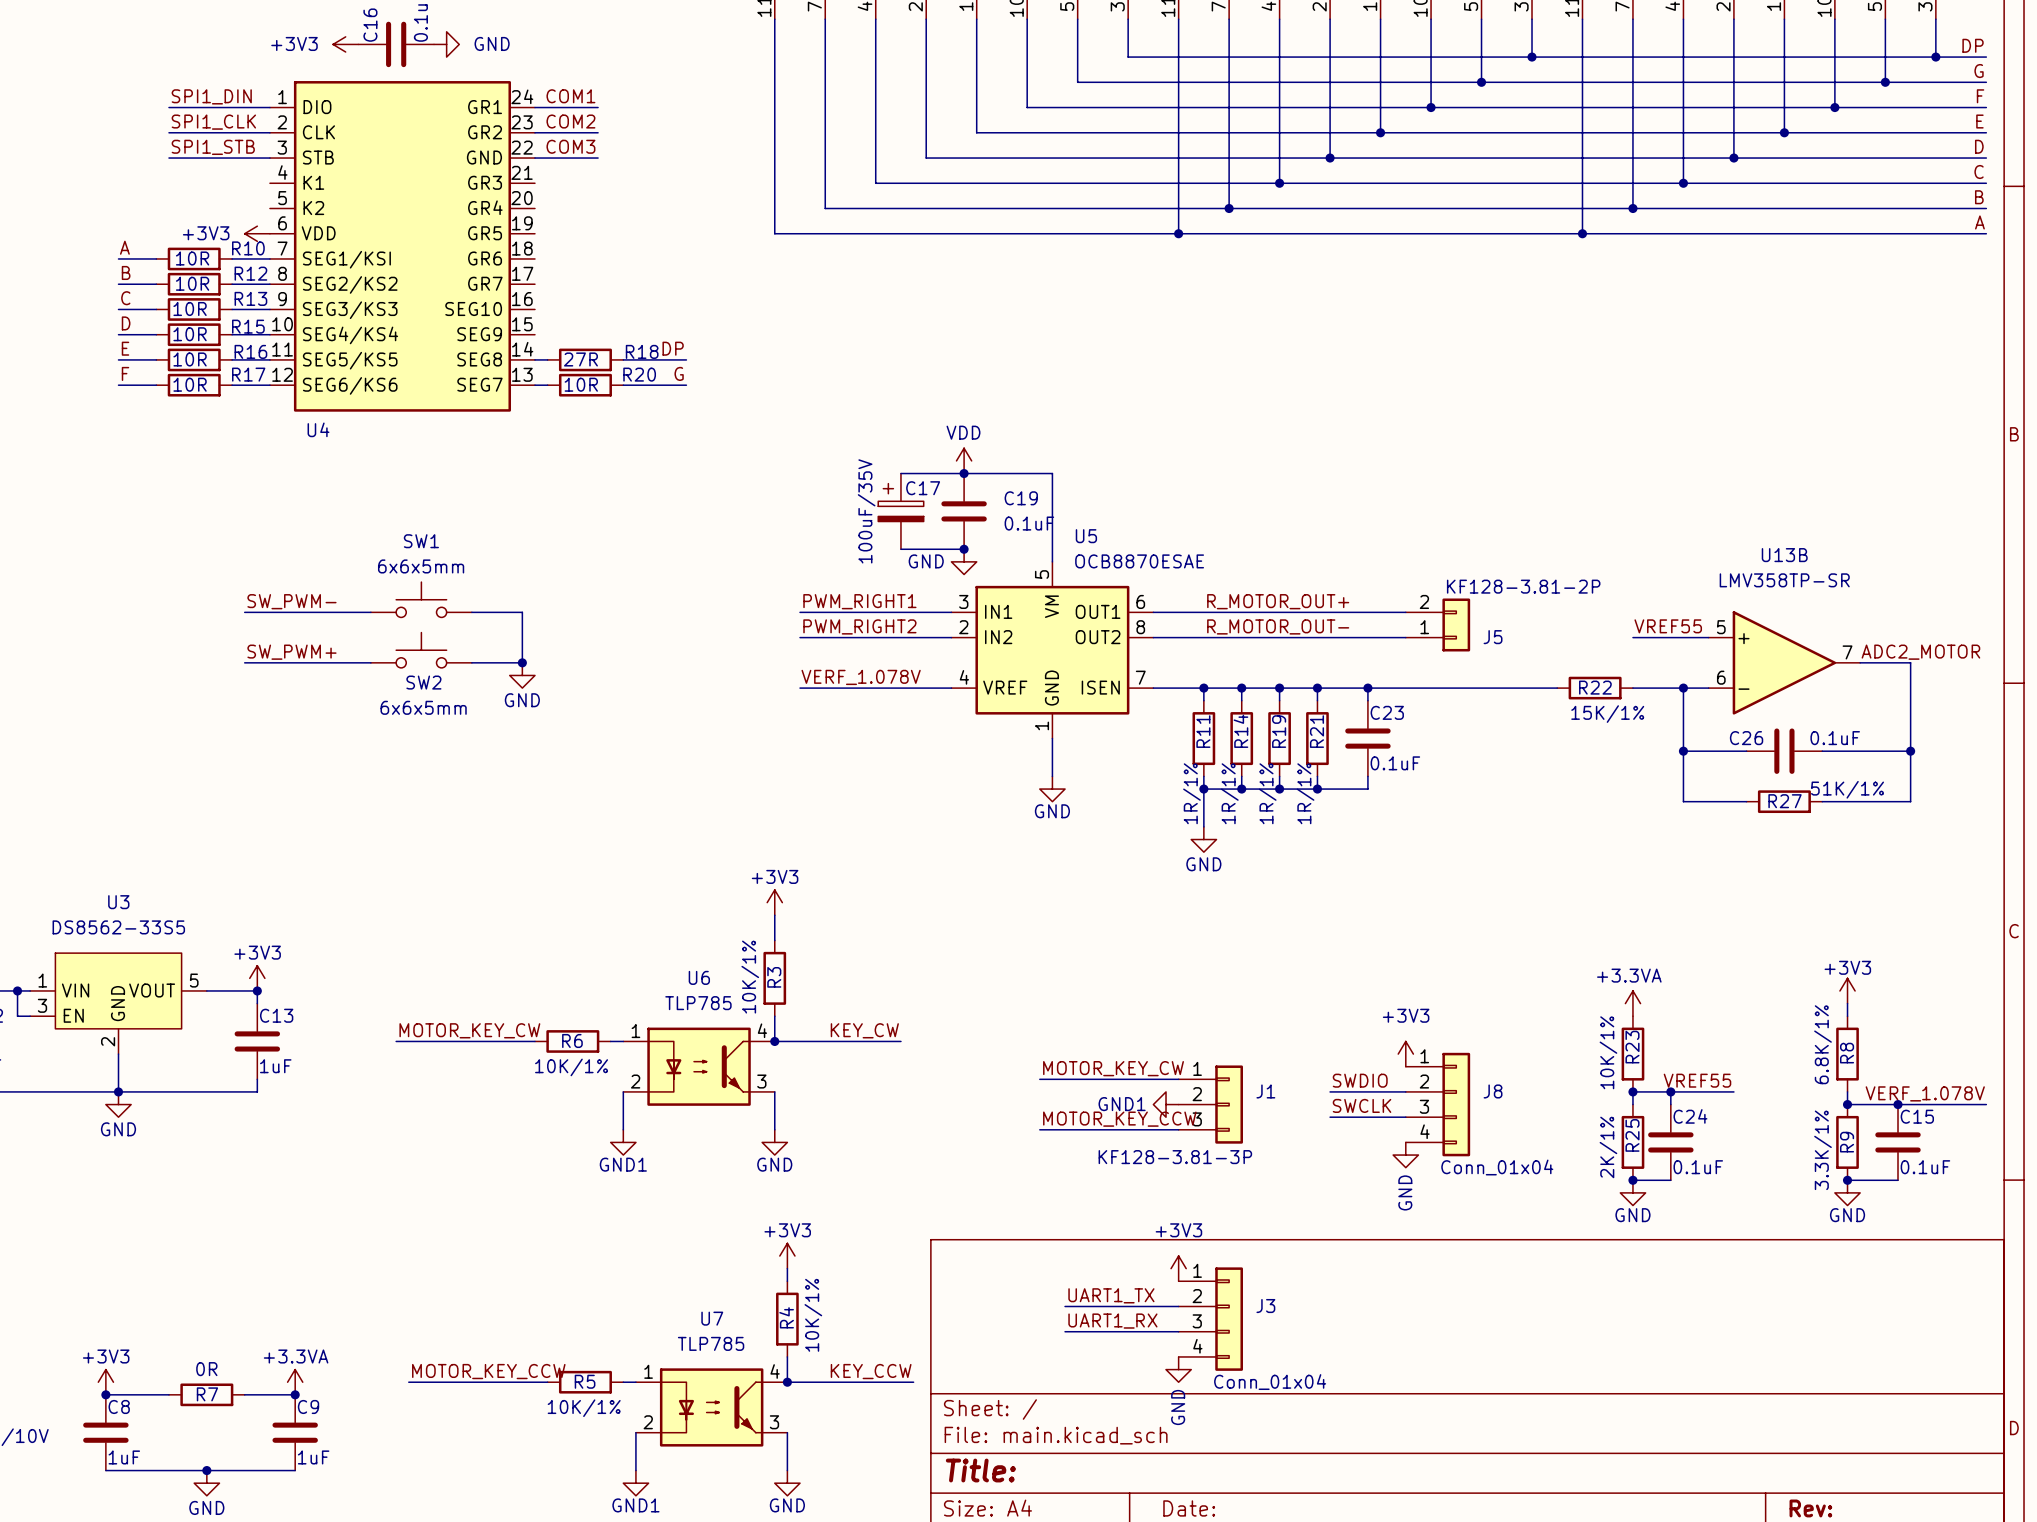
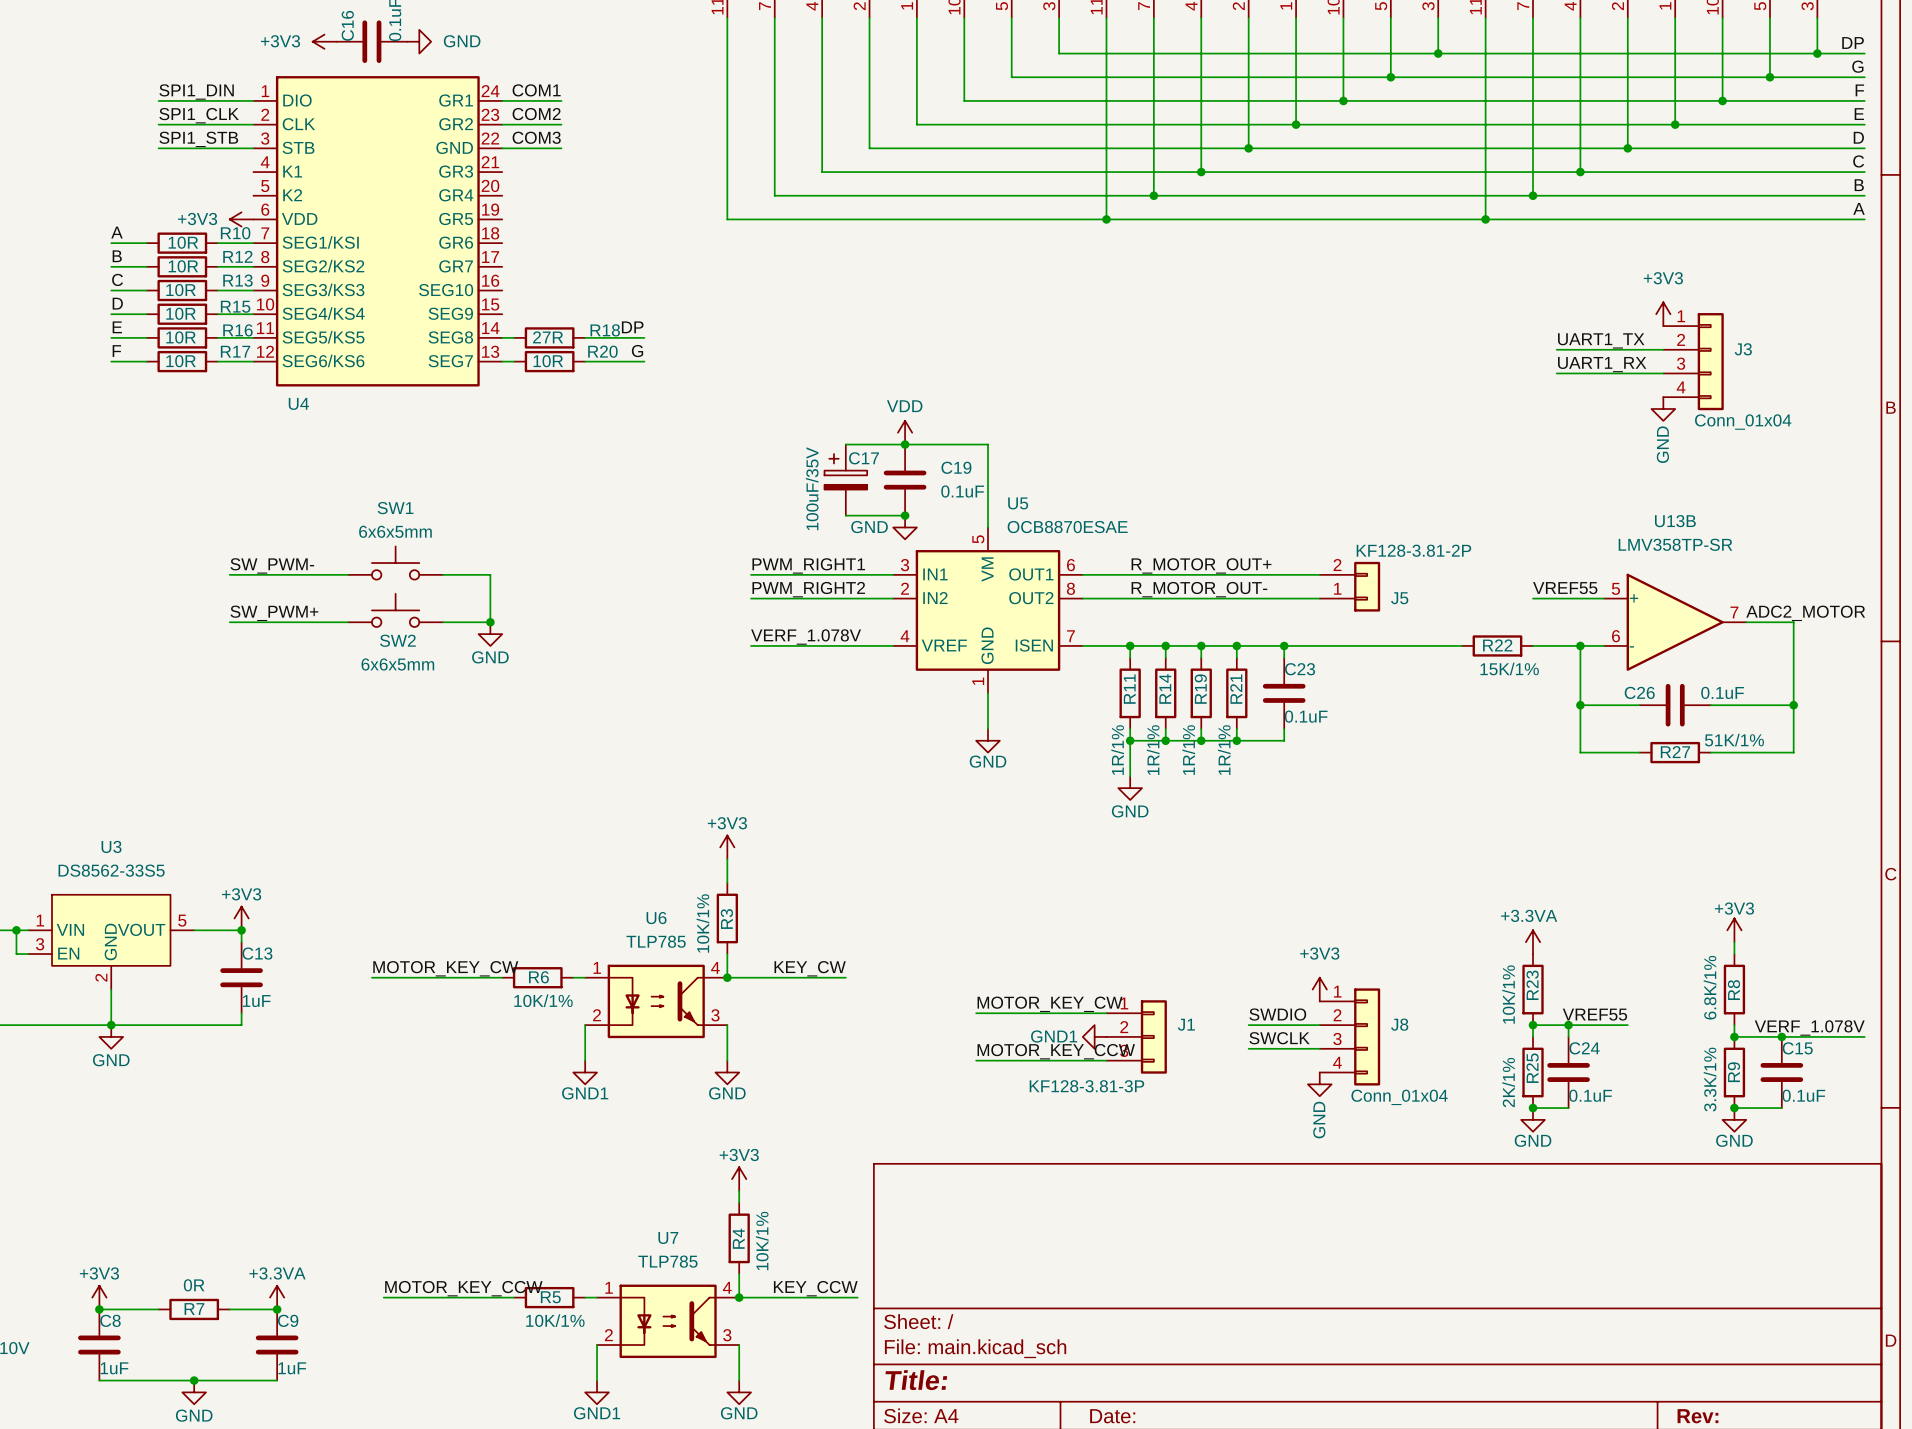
power symbol: none -> +3V3 (1663, 314)
label: none -> UART1_TX (1601, 340)
wire: none -> (1556, 349) (1663, 349)
label: none -> UART1_RX (1602, 364)
wire: none -> (1556, 373) (1663, 373)
power symbol: none -> GND (1663, 409)
power symbol: +3V3 (1178, 1268) -> none
label: UART1_TX (1111, 1295) -> none
wire: (1065, 1306) (1178, 1306) -> none
J3 position: (1210, 1319) -> (1693, 361)
label: UART1_RX (1112, 1321) -> none
wire: (1065, 1331) (1178, 1331) -> none
power symbol: GND (1178, 1369) -> none

